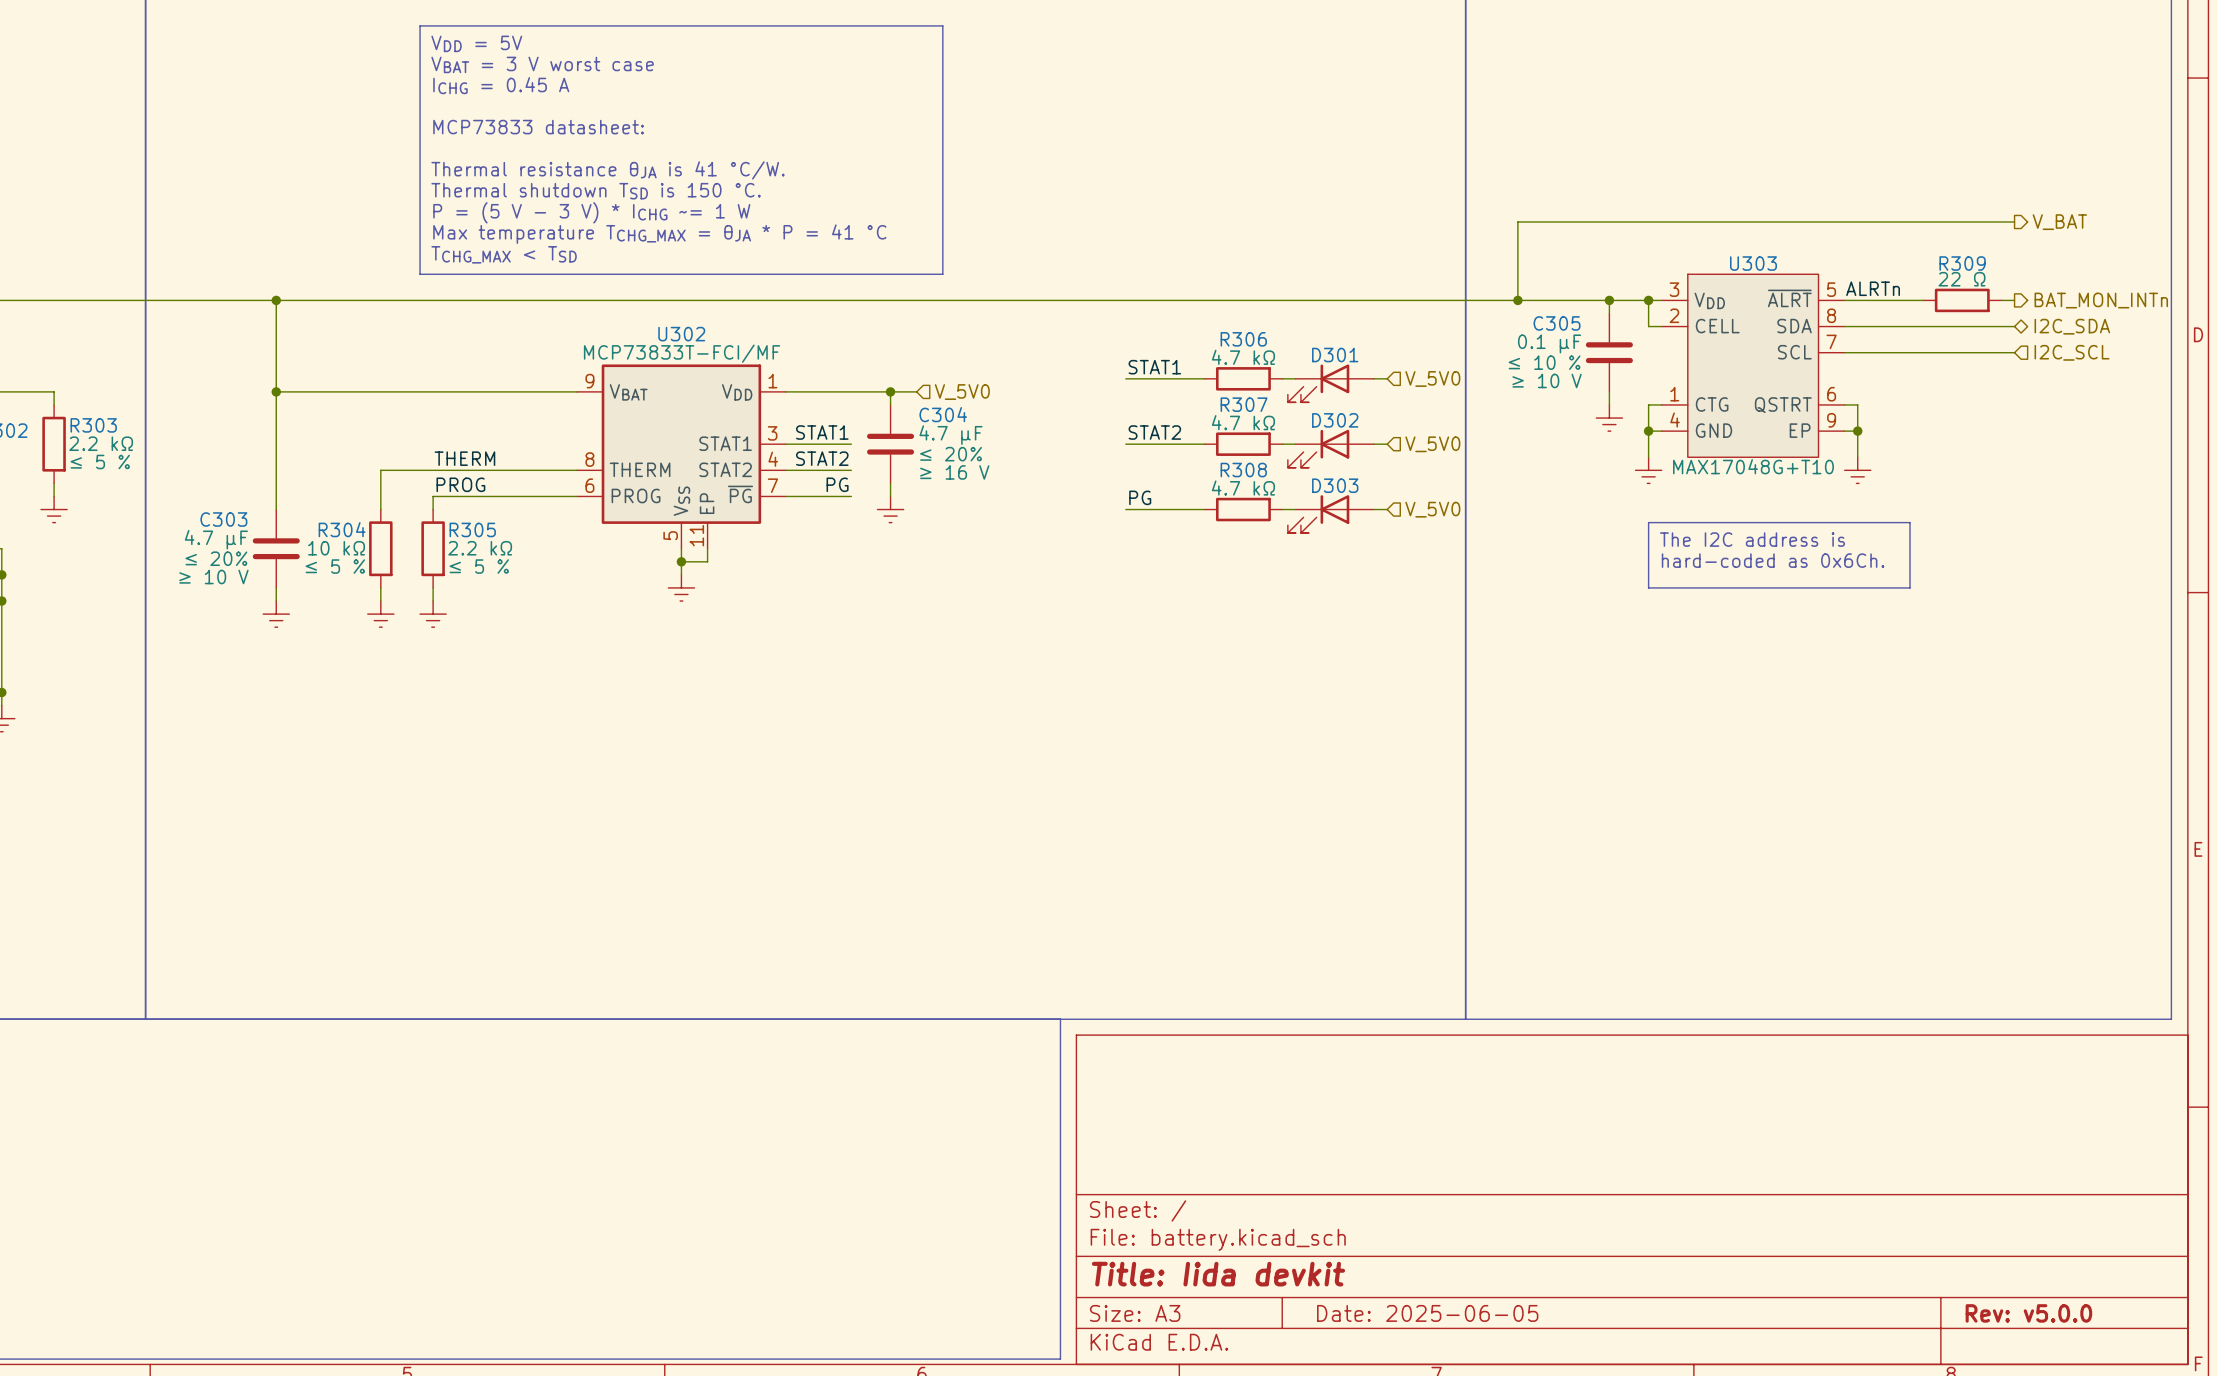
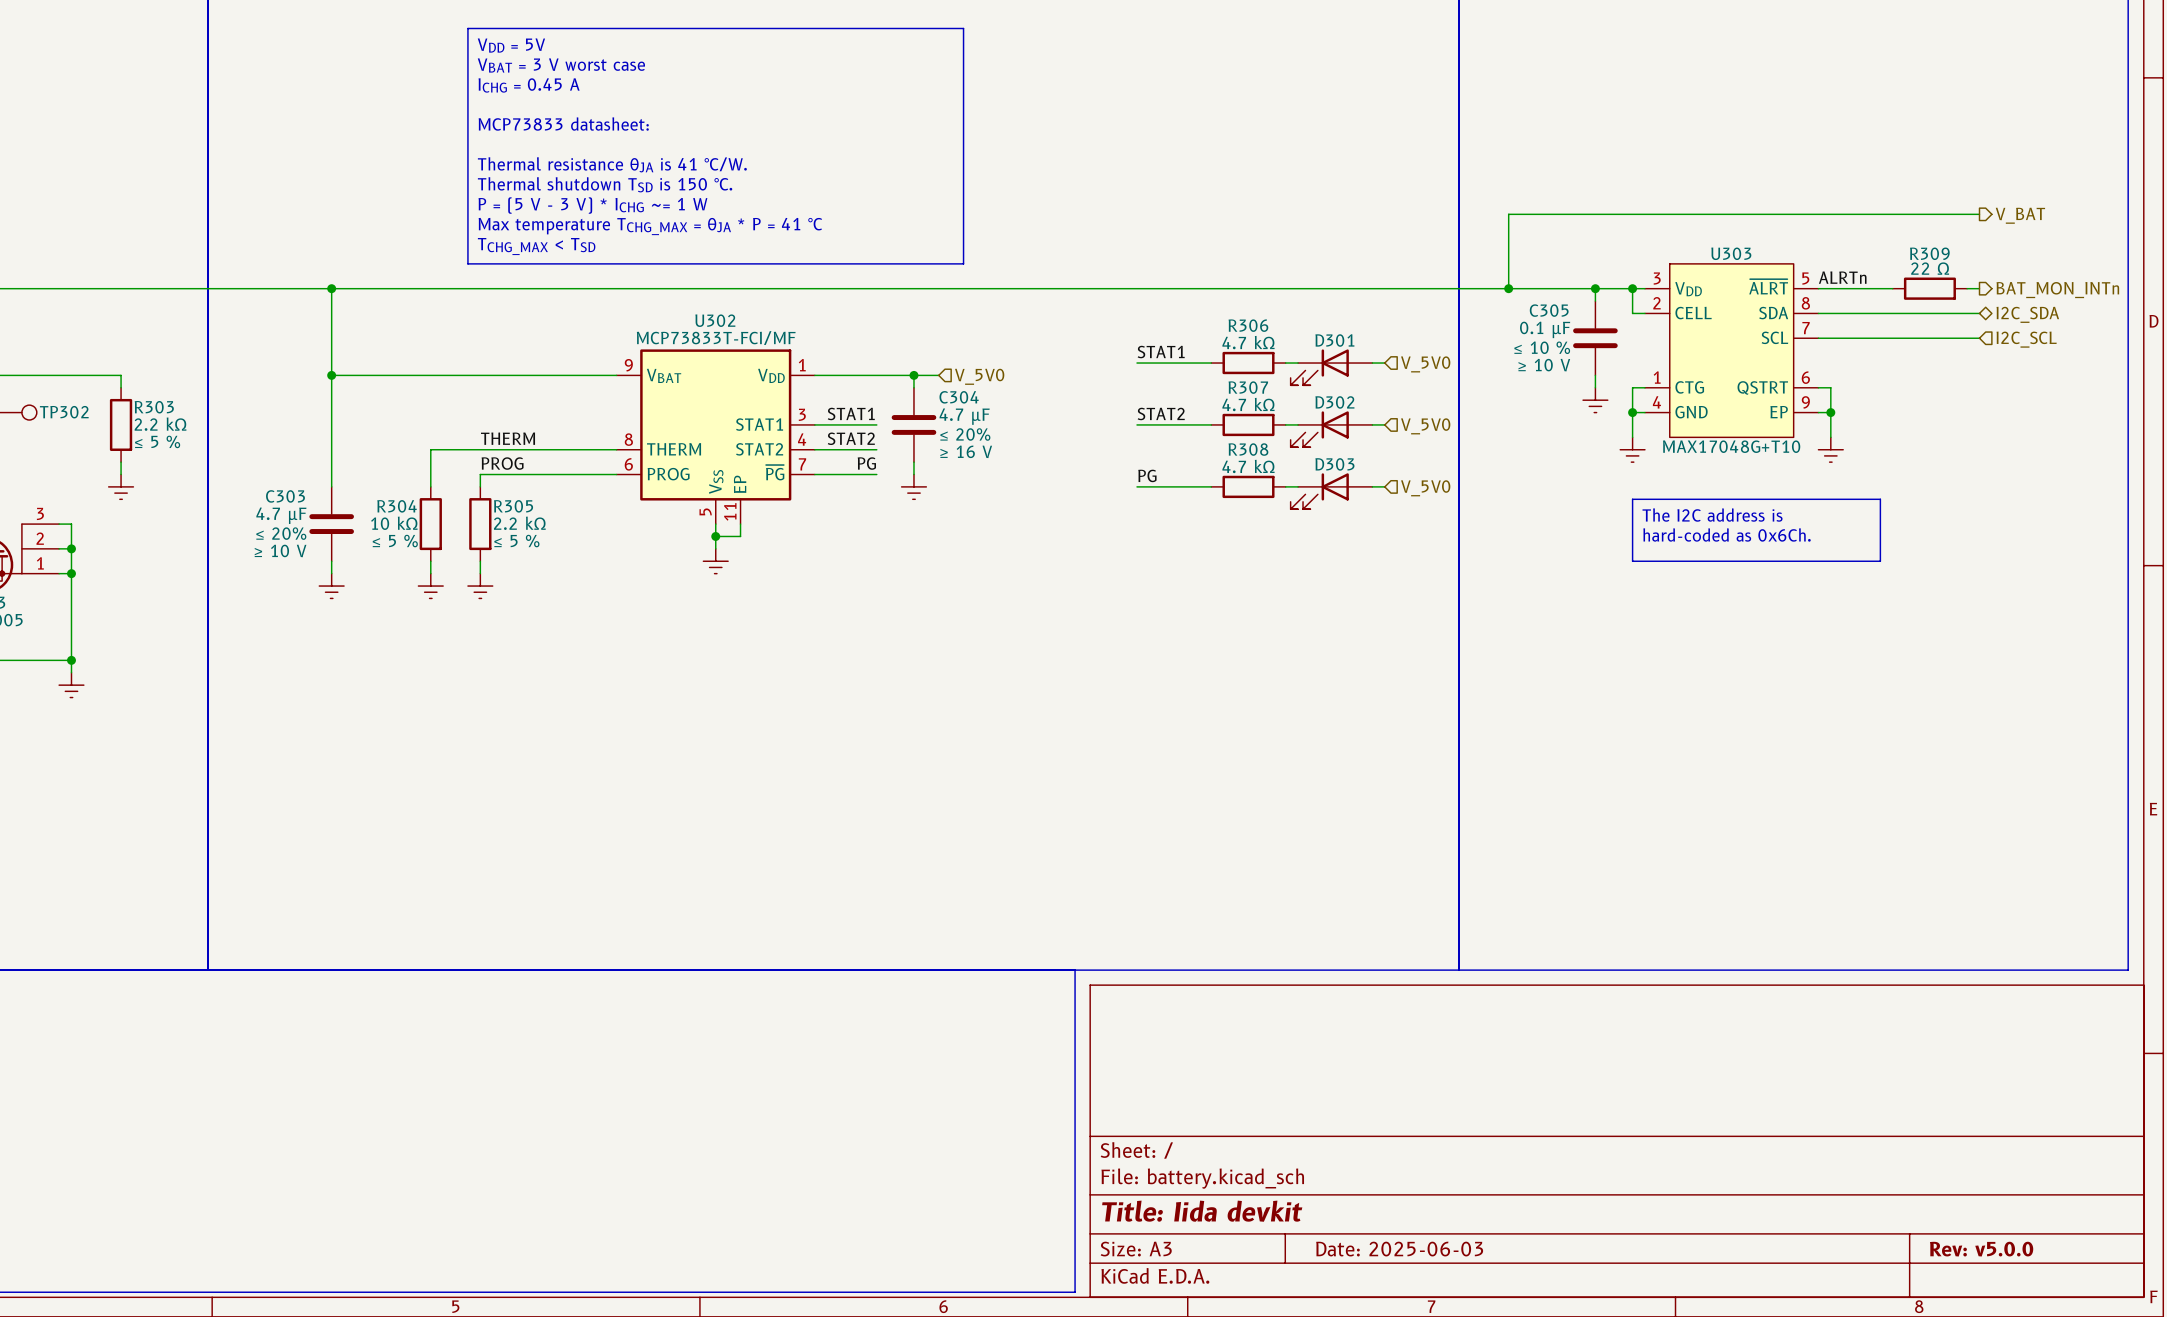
title block: Date: 2025-06-05 (1427, 1313) -> Date: 2025-06-03 (1399, 1249)

